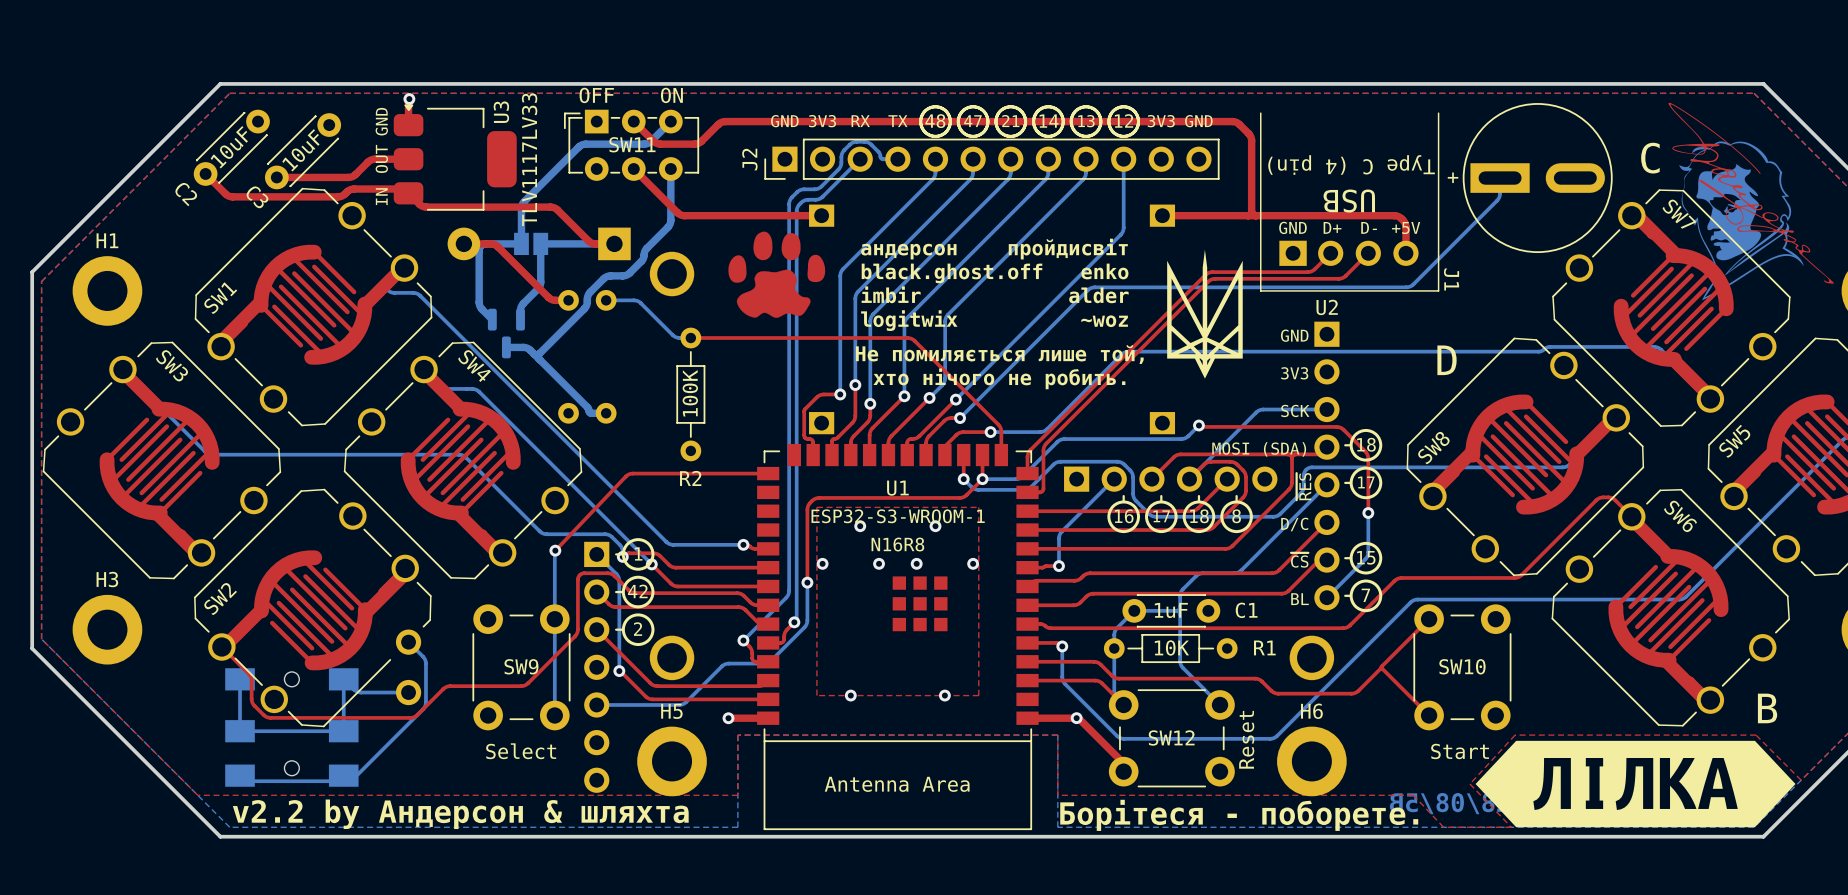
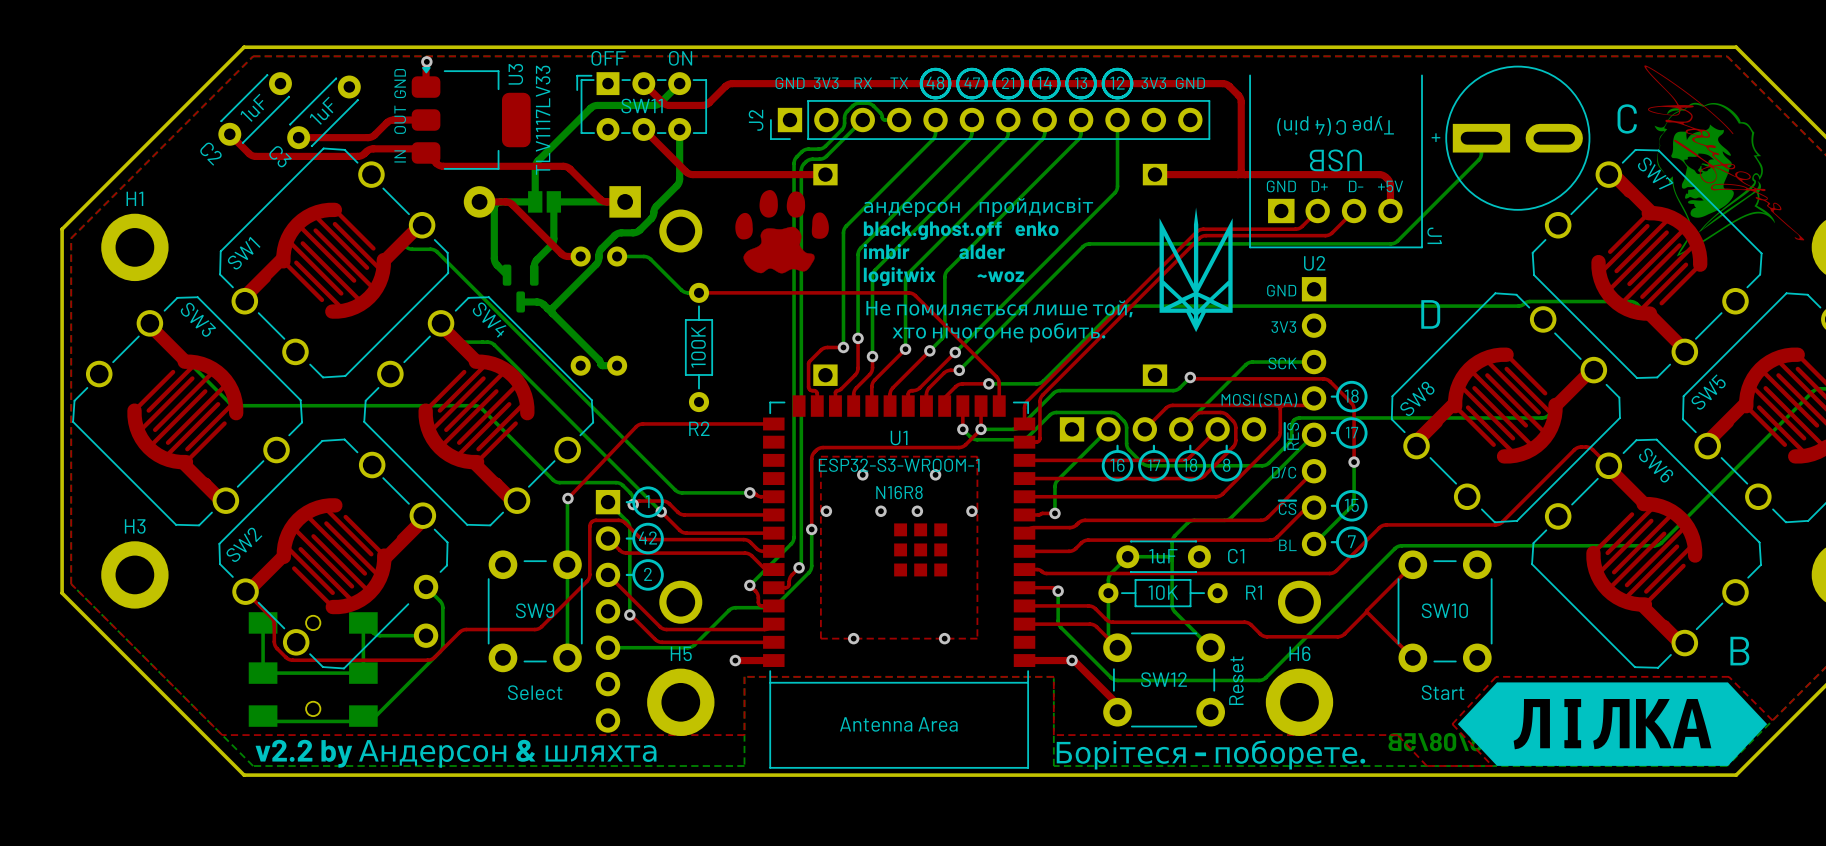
C2 value: 10uF (229, 147) -> 1uF (252, 107)
C3 value: 10uF (300, 150) -> 1uF (321, 110)

